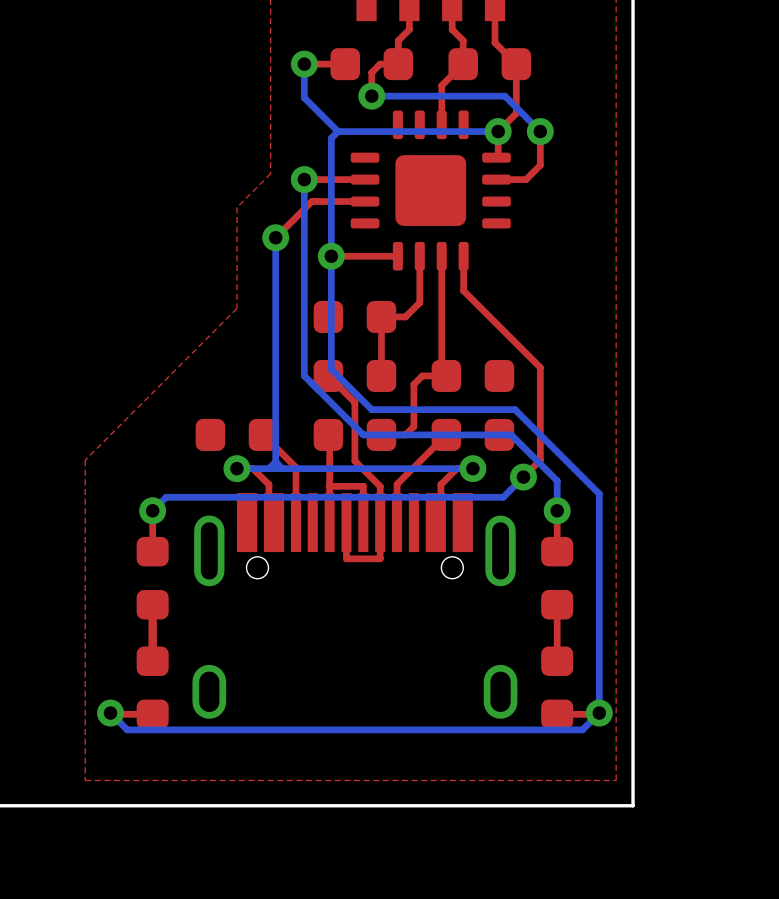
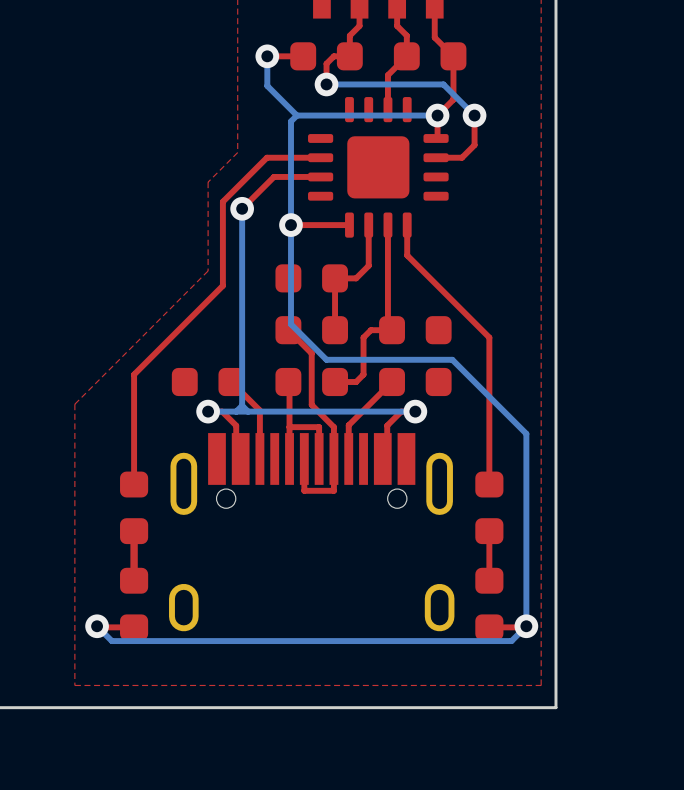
top track: none -> (266, 157) (222, 201) (222, 285) (134, 374) (134, 448)
bottom track: (304, 179) (304, 375) (363, 434) (511, 434) (557, 480) (557, 510) -> none
via: (304, 179) -> none
top track: (540, 367) (540, 460) (523, 477) -> (474, 322) (489, 337) (489, 448)
bottom track: (523, 477) (503, 497) (166, 497) (152, 510) -> none
via: (523, 477) -> none
via: (152, 510) -> none
via: (557, 510) -> none

